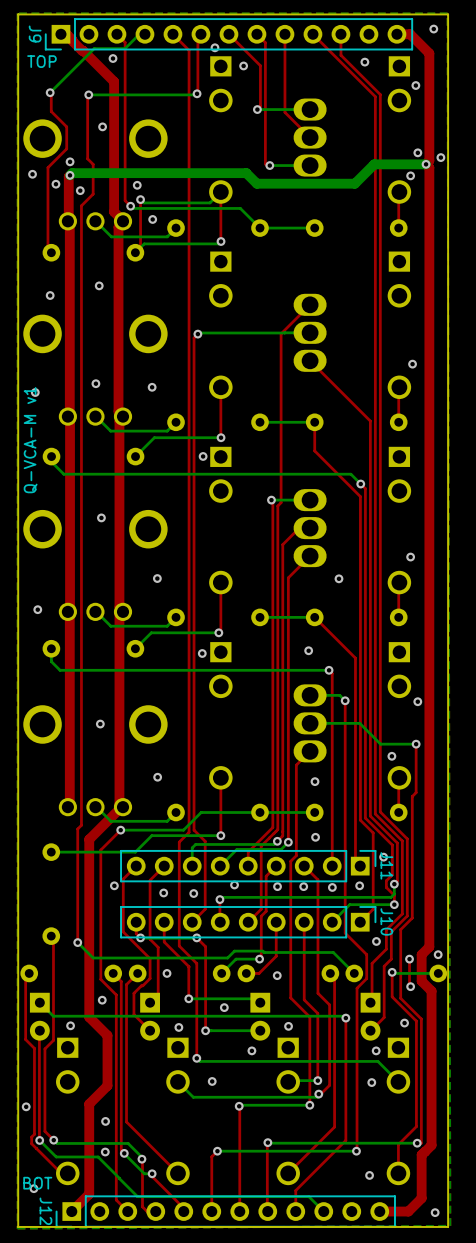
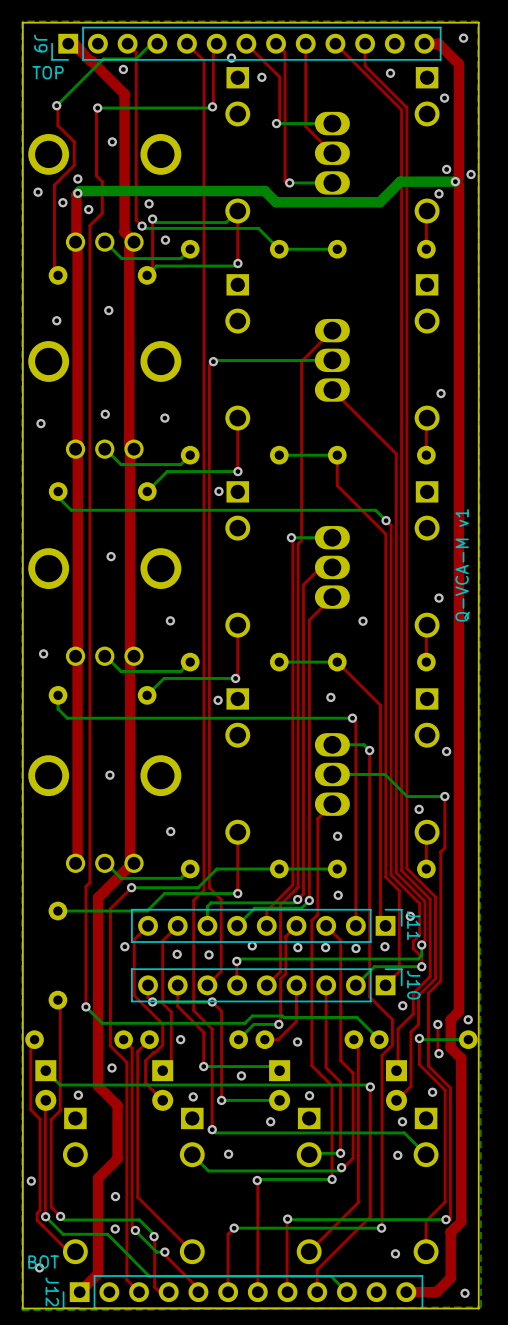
text: Q-VCA-M v1 (30, 440) -> none
text: none -> Q-VCA-M v1 (462, 565)

